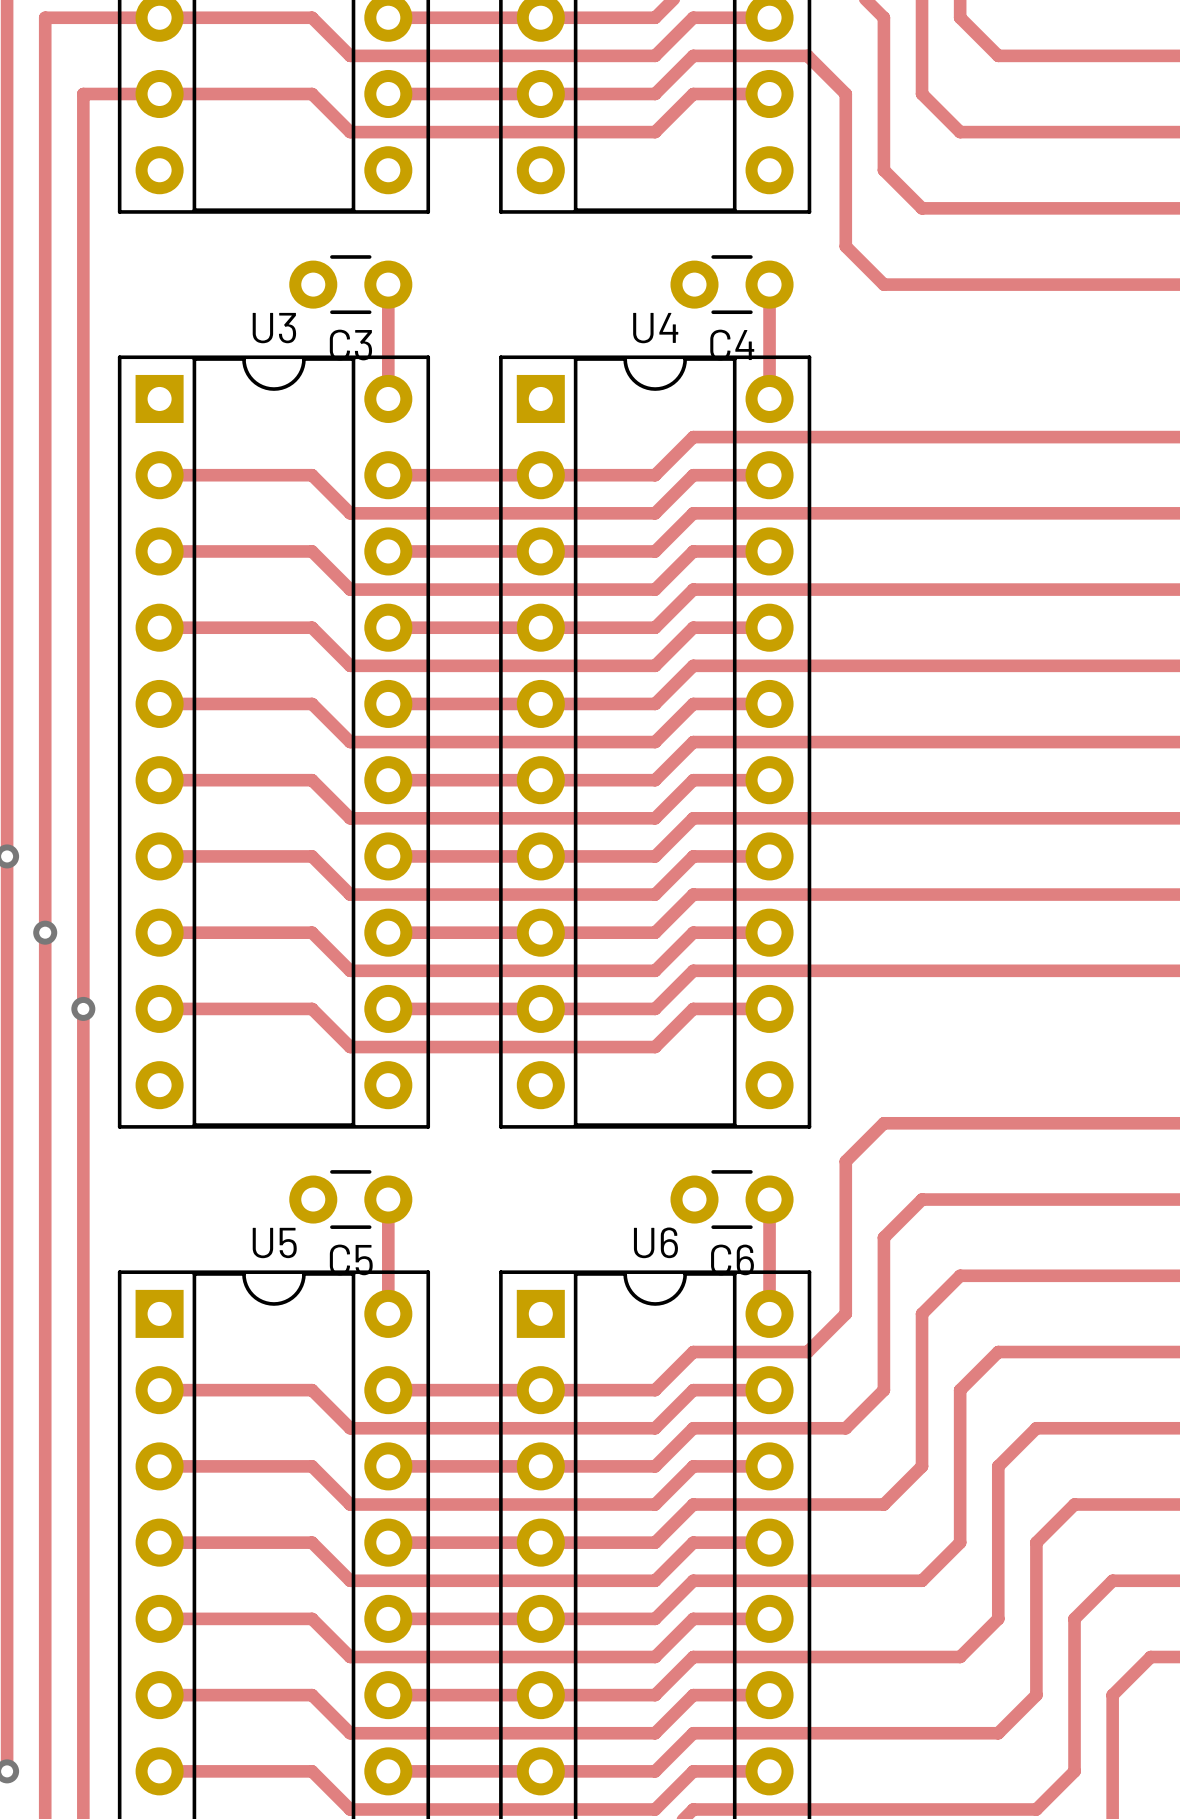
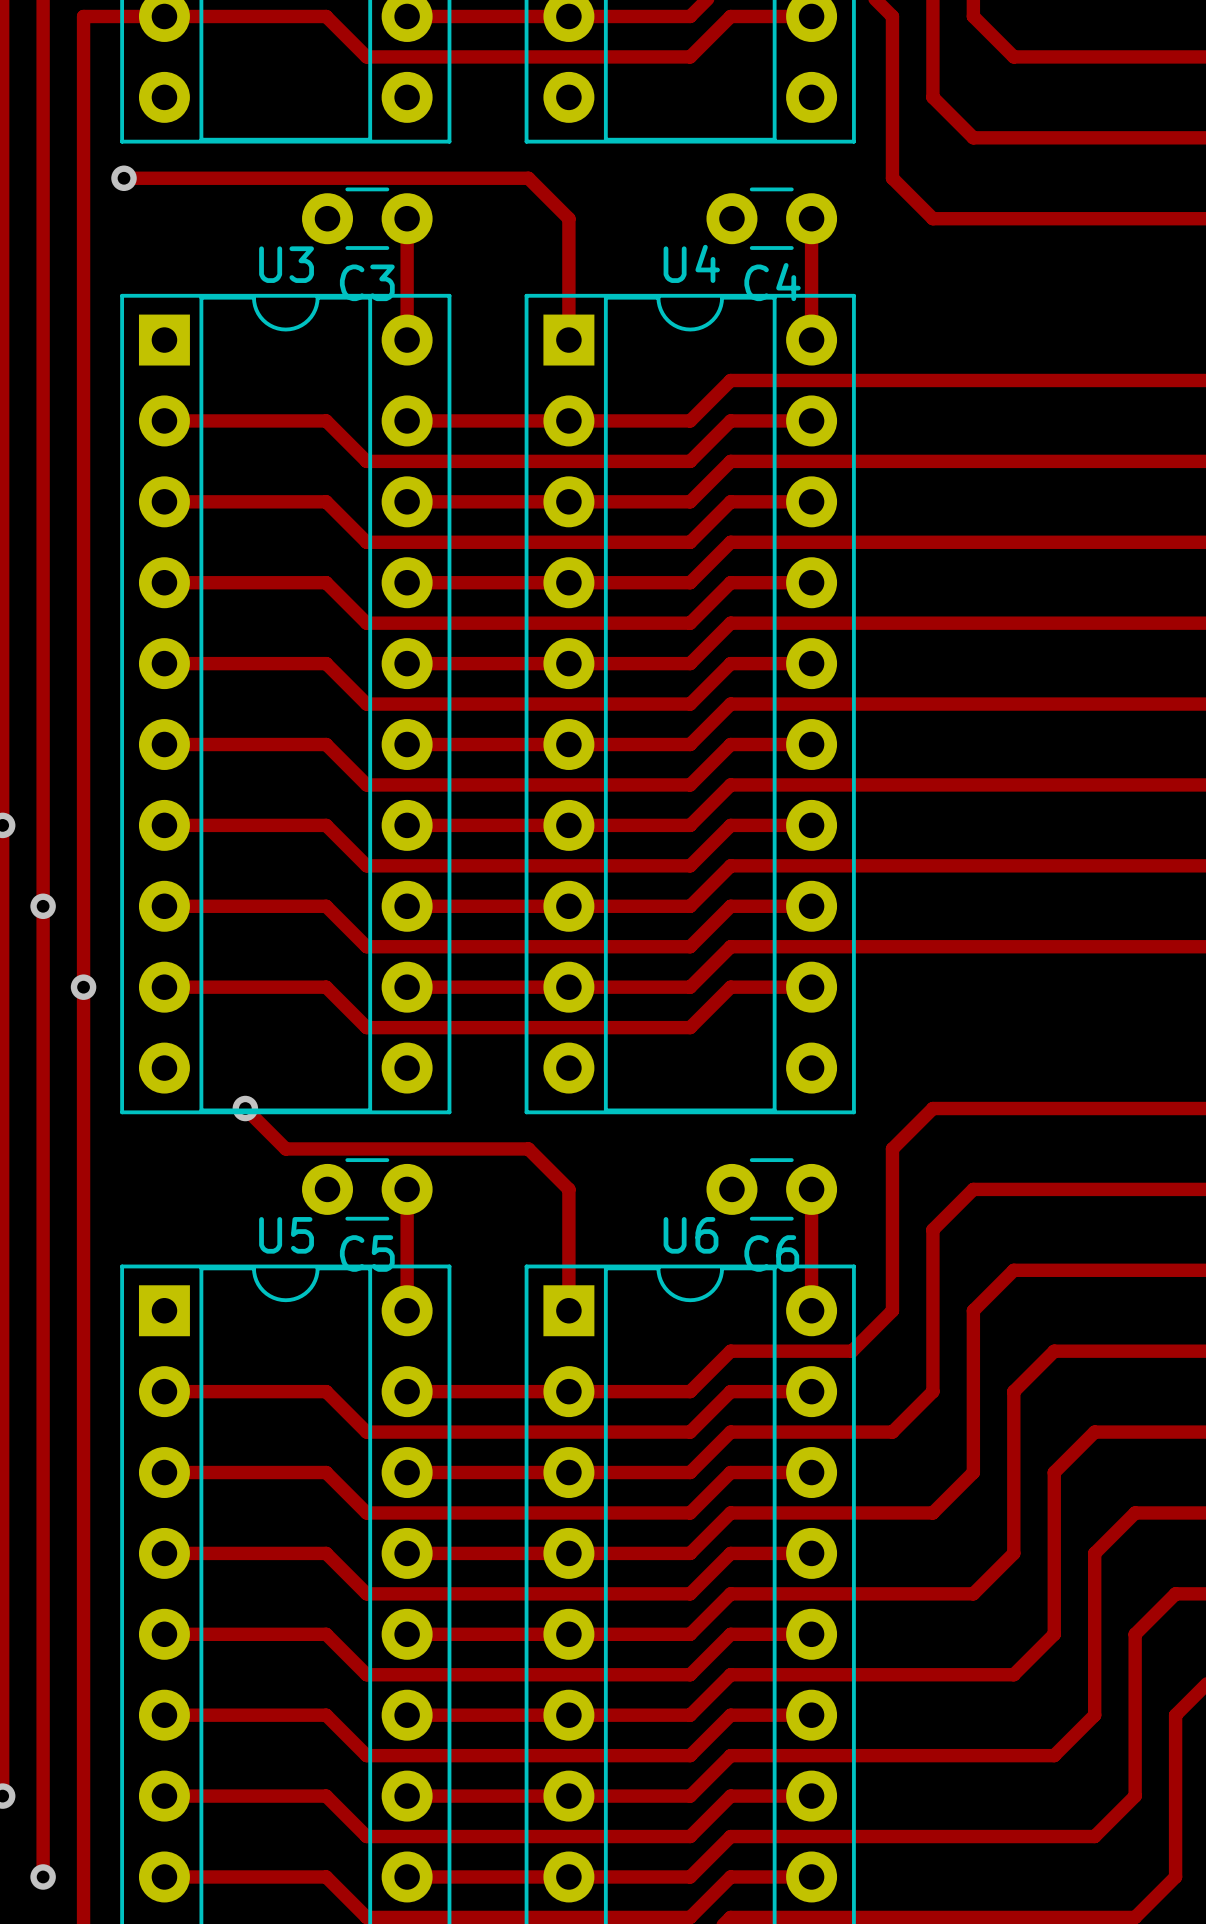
track: none -> (124, 178) (528, 178) (568, 218) (568, 340)
via: none -> (124, 178)
track: none -> (245, 1108) (285, 1148) (528, 1148) (568, 1189) (568, 1310)
via: none -> (245, 1108)

